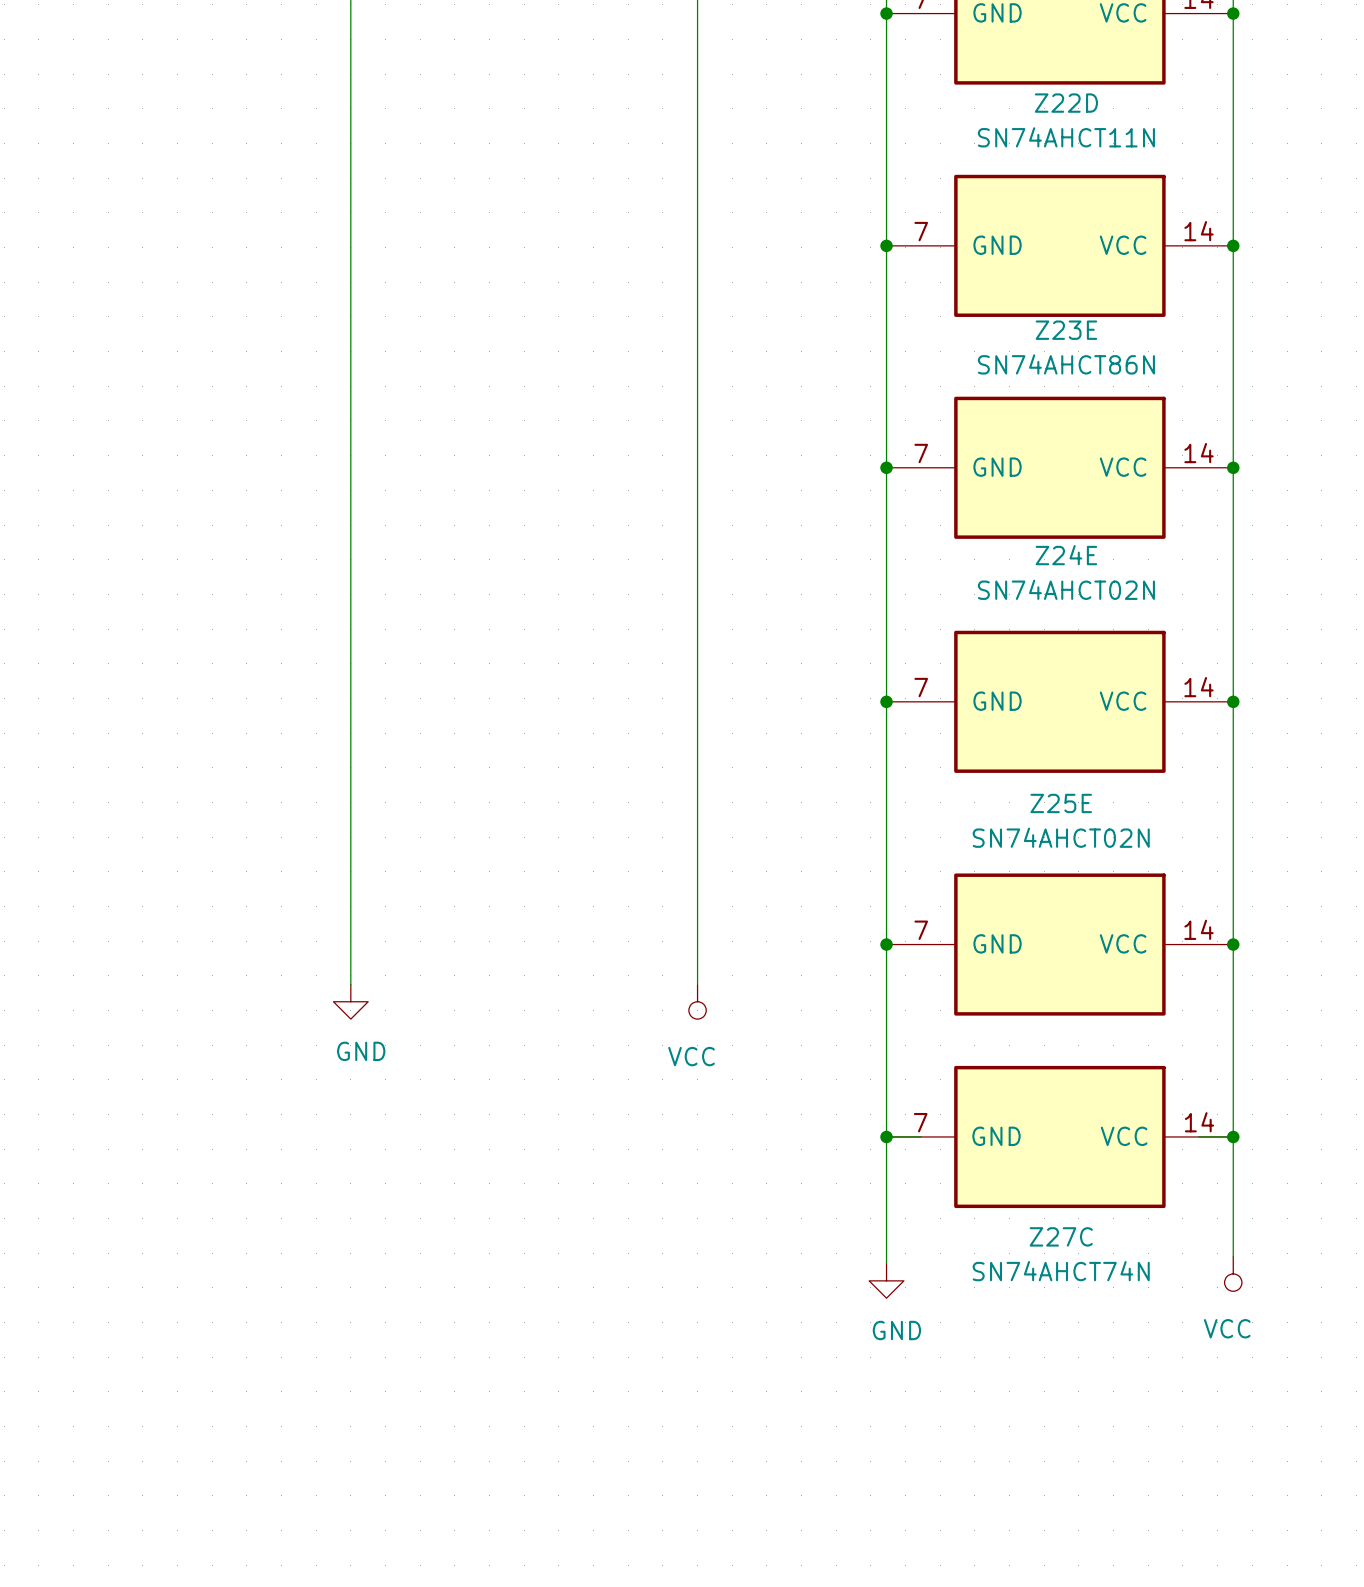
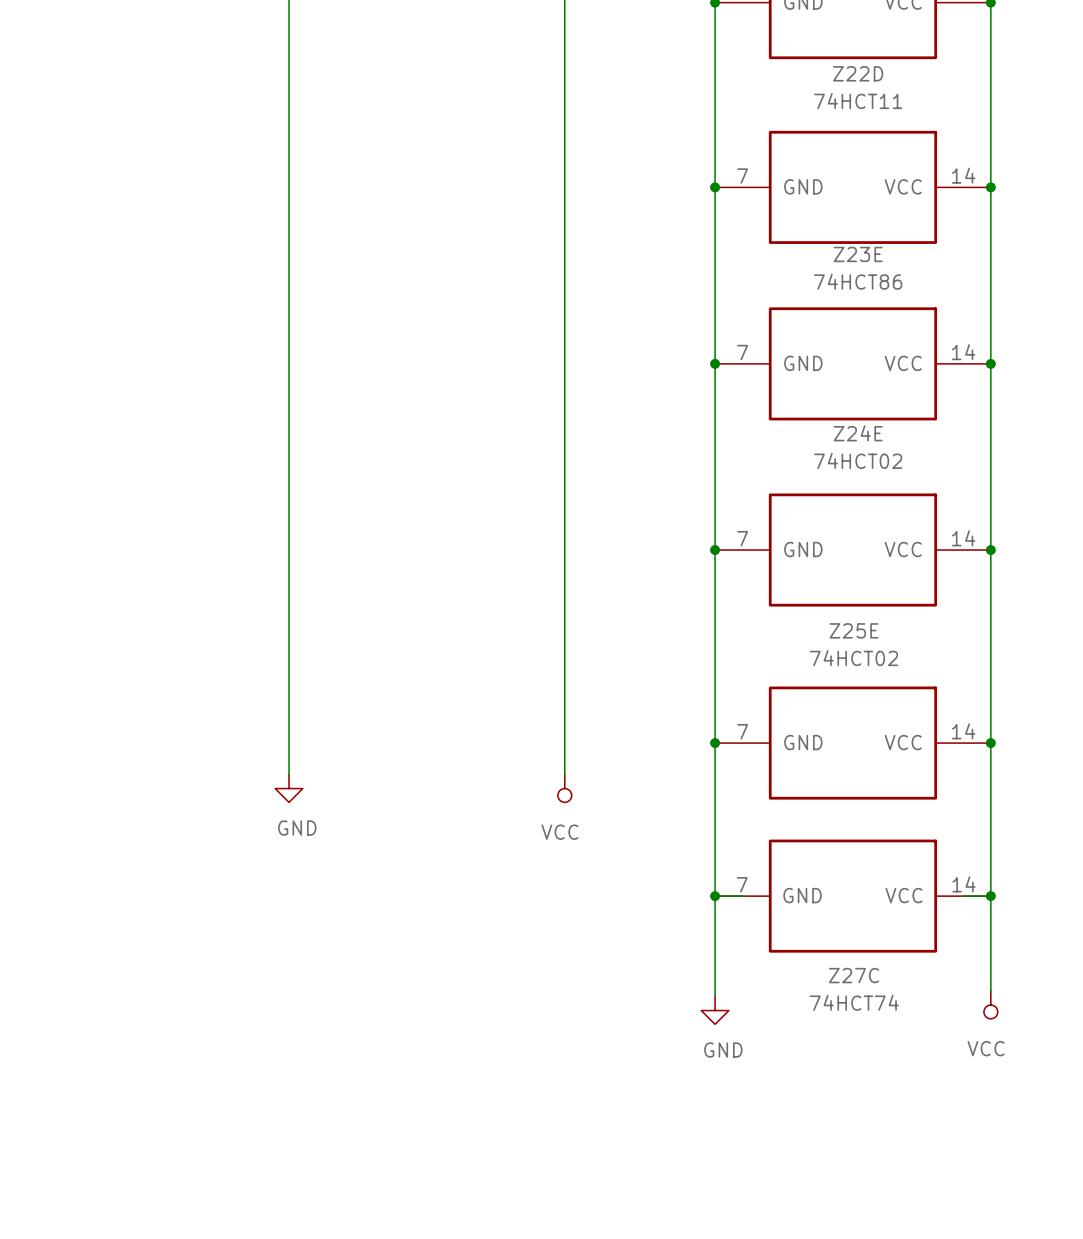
Z22D value: SN74AHCT11N (1066, 137) -> 74HCT11 (858, 101)
Z23E value: SN74AHCT86N (1066, 364) -> 74HCT86 (858, 281)
Z24E value: SN74AHCT02N (1066, 589) -> 74HCT02 (858, 460)
Z25E value: SN74AHCT02N (1061, 837) -> 74HCT02 (854, 658)
Z27C value: SN74AHCT74N (1061, 1271) -> 74HCT74 (854, 1002)

